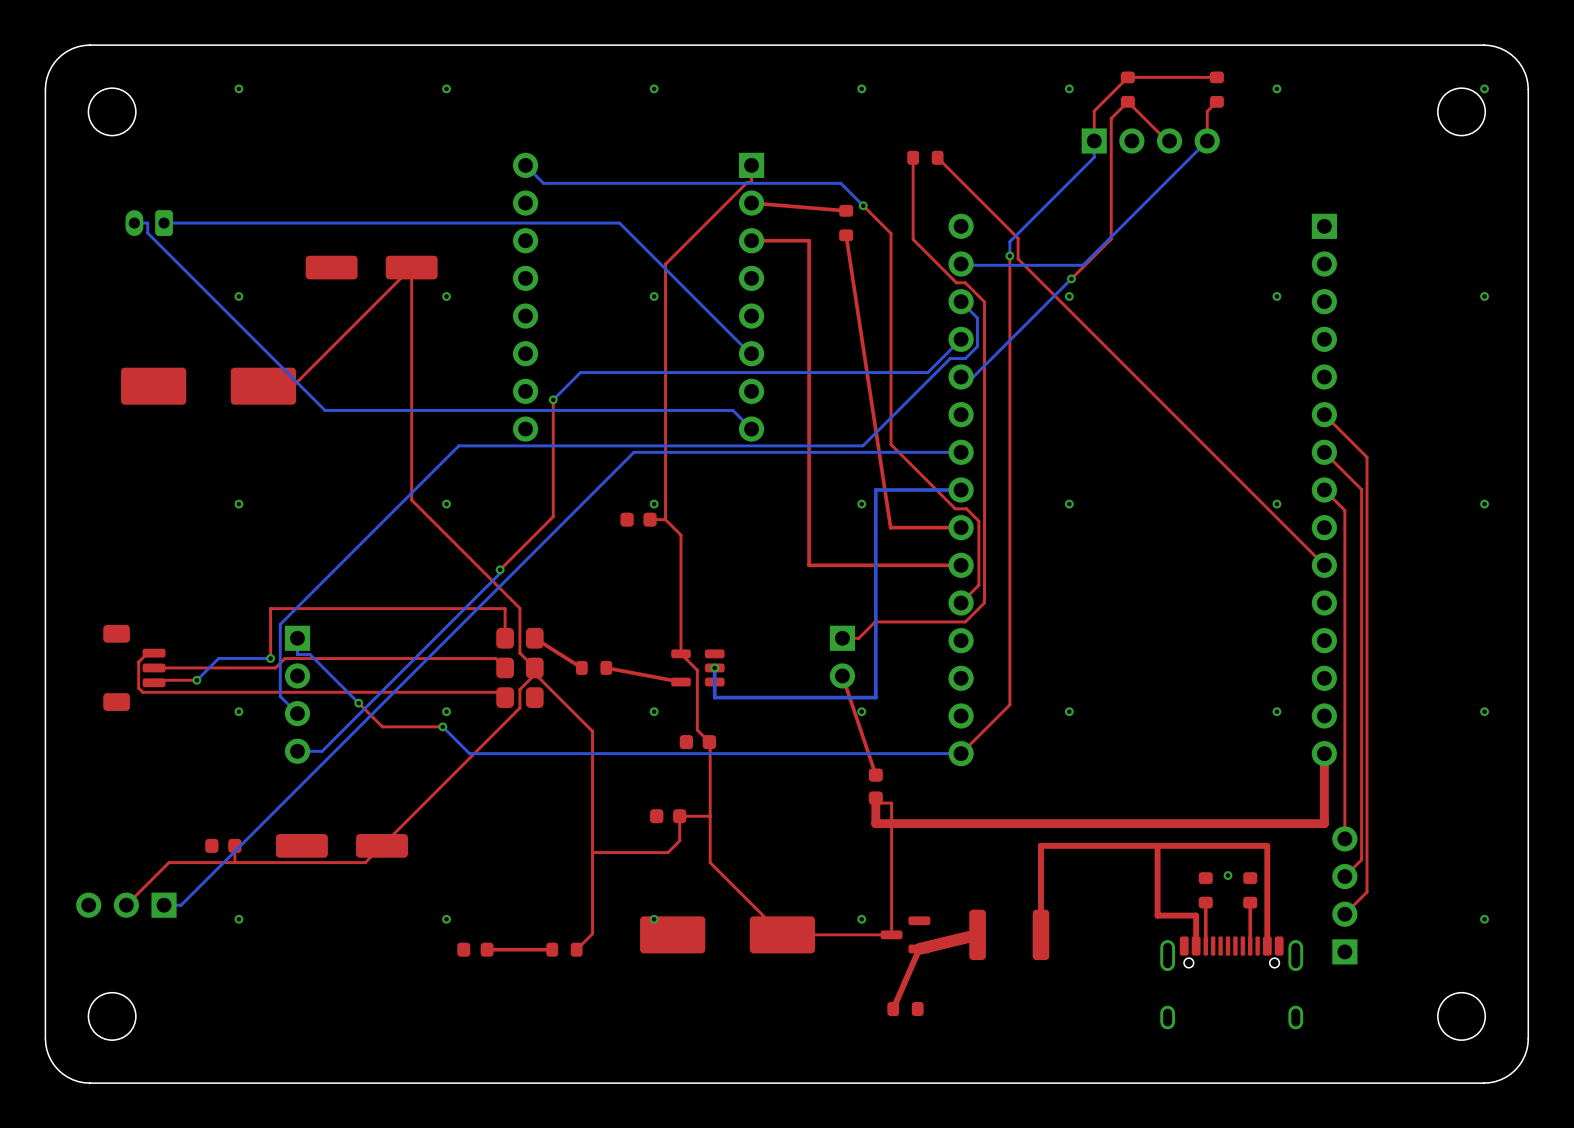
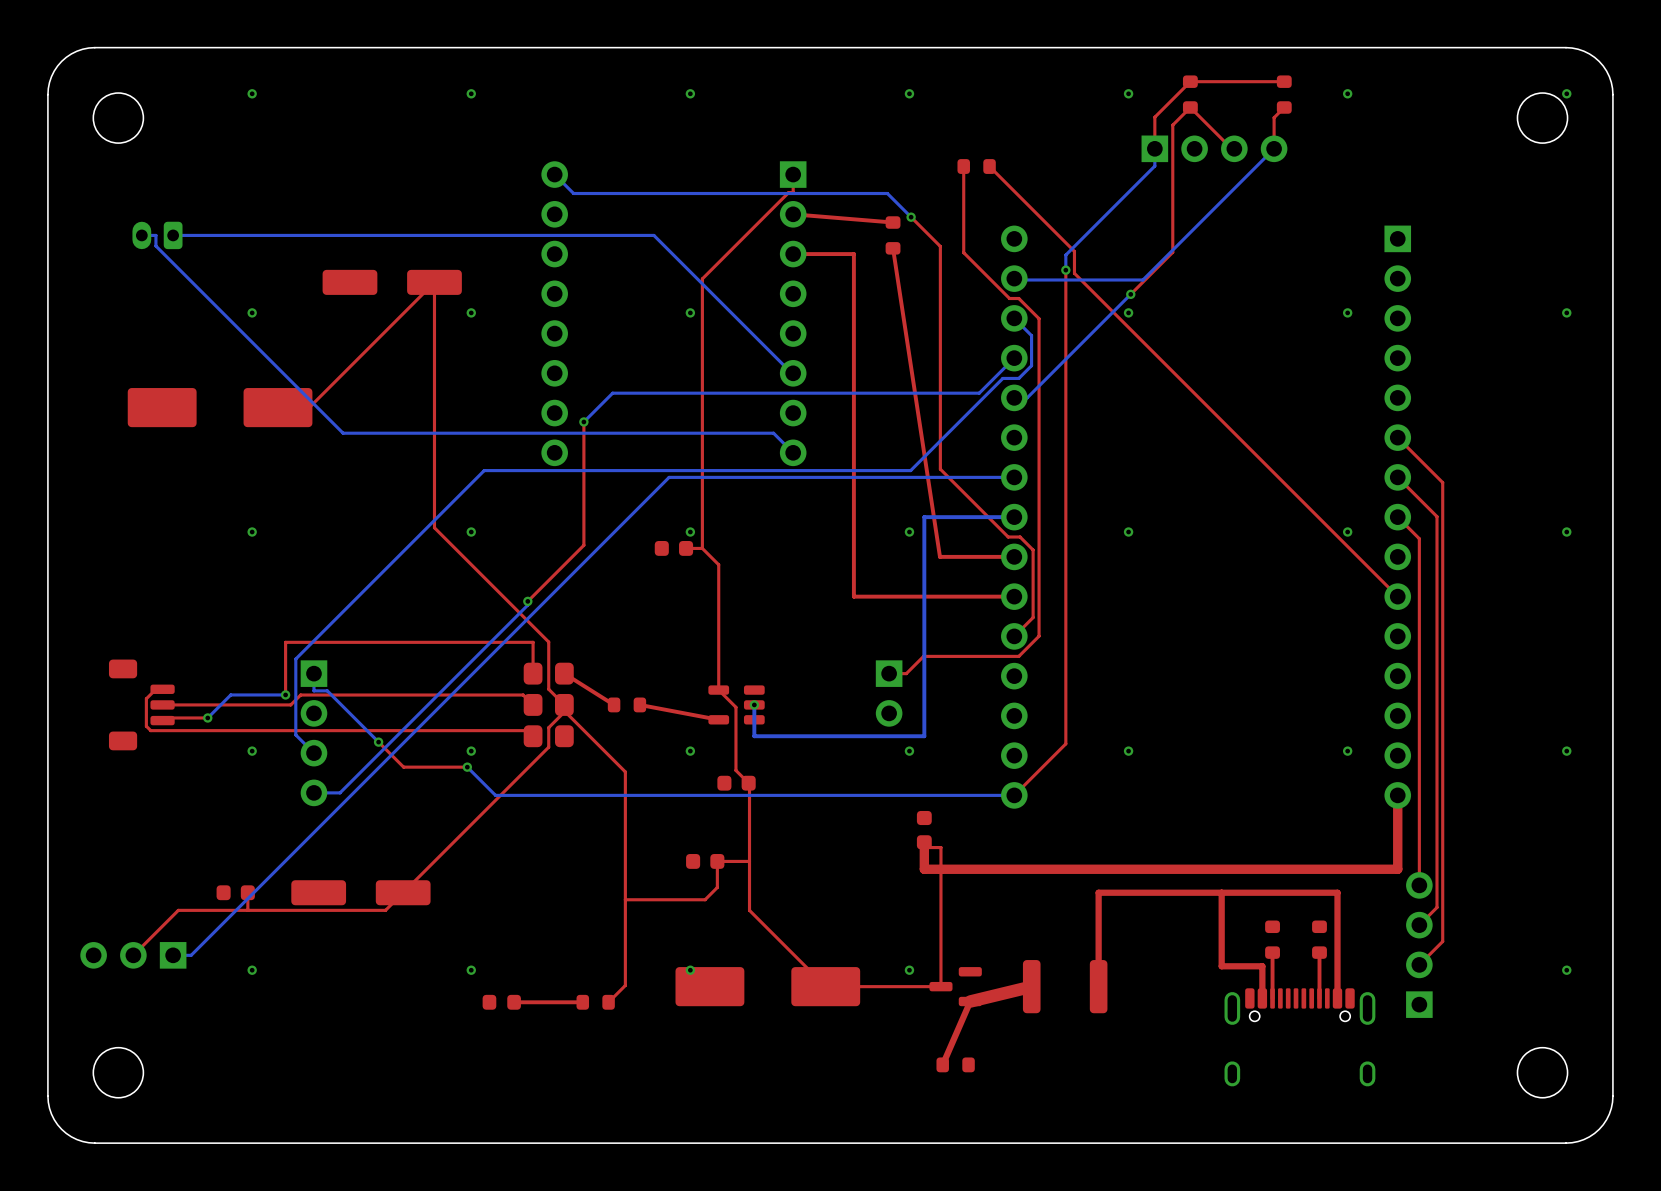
top track: (842, 675) (875, 775) -> none
via: (1228, 875) -> none

